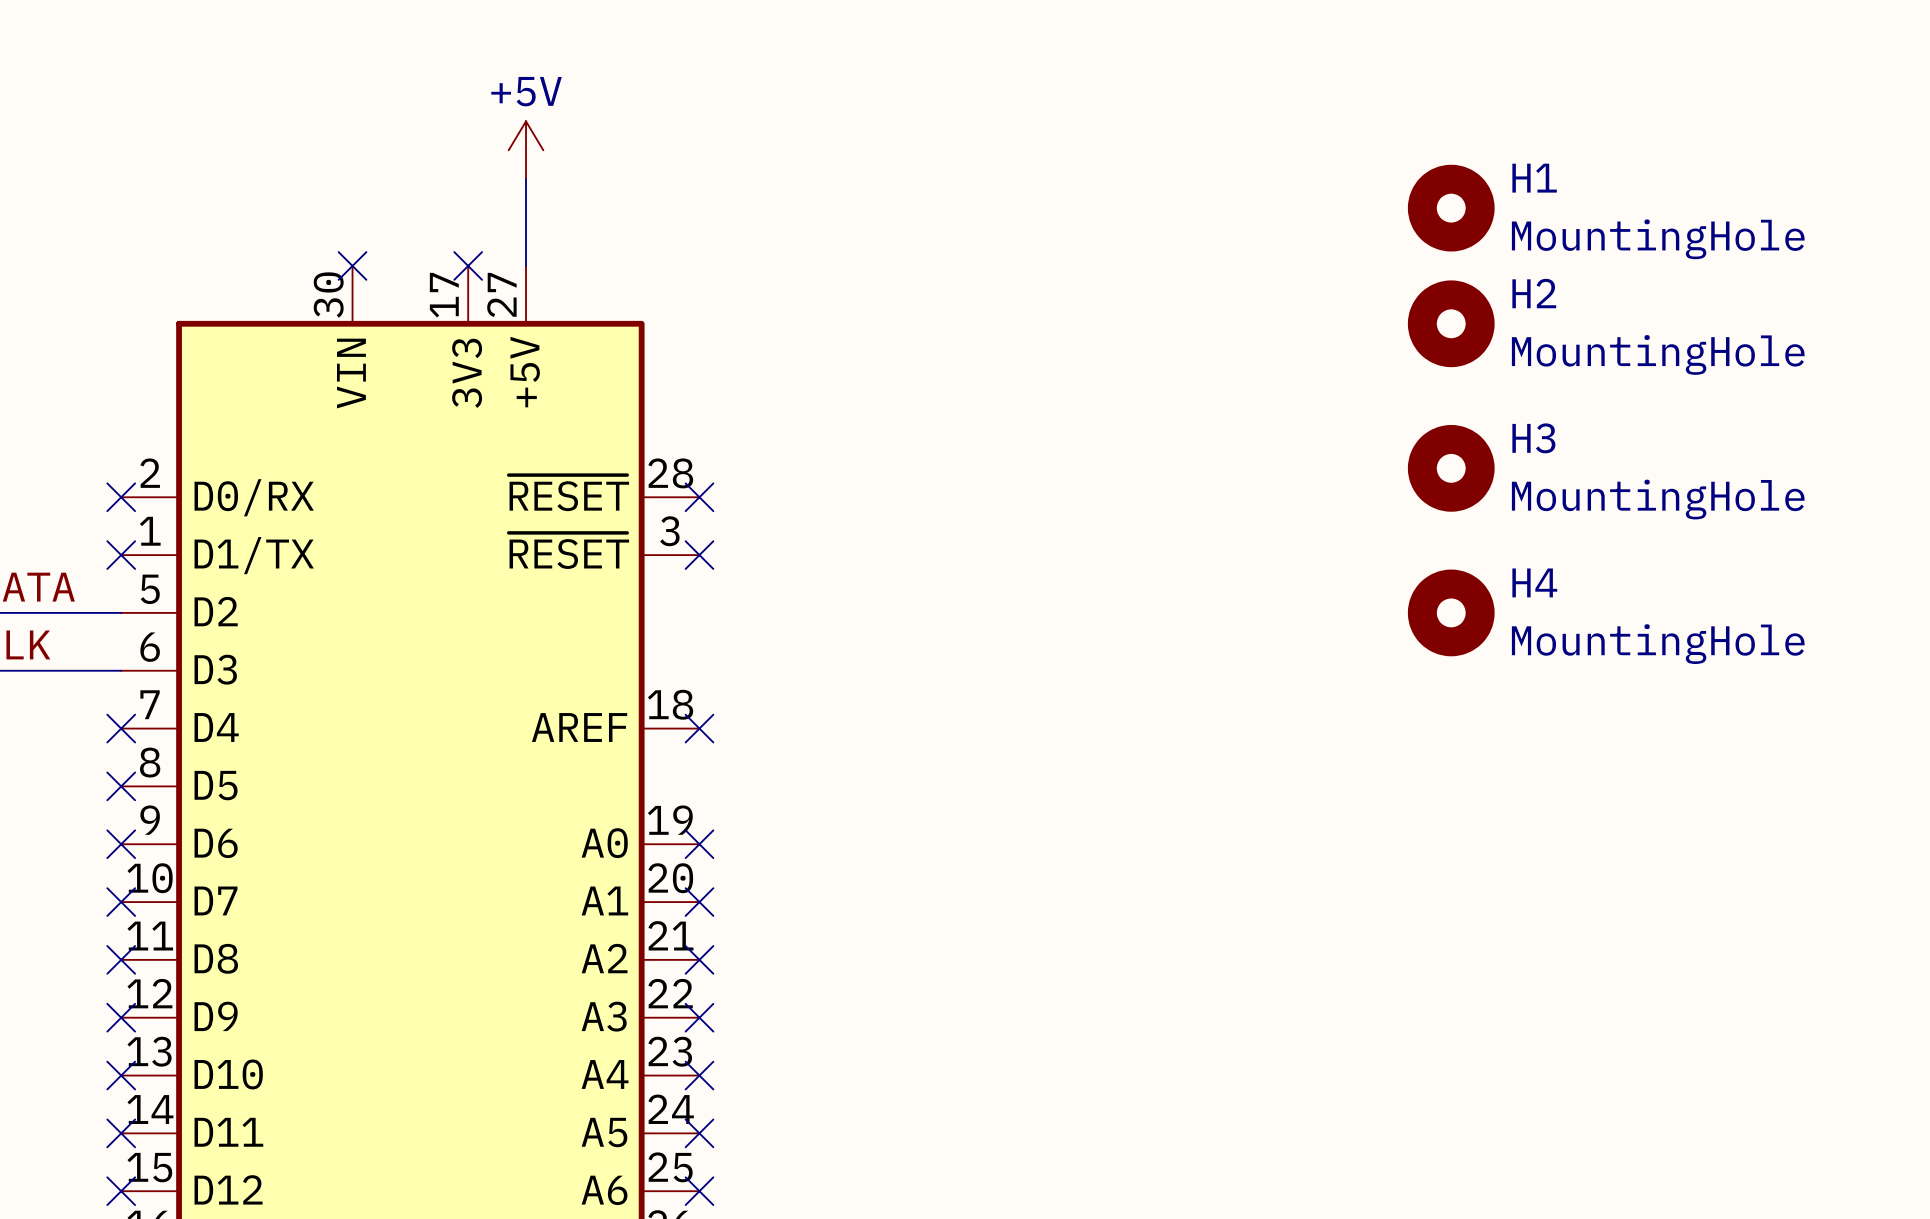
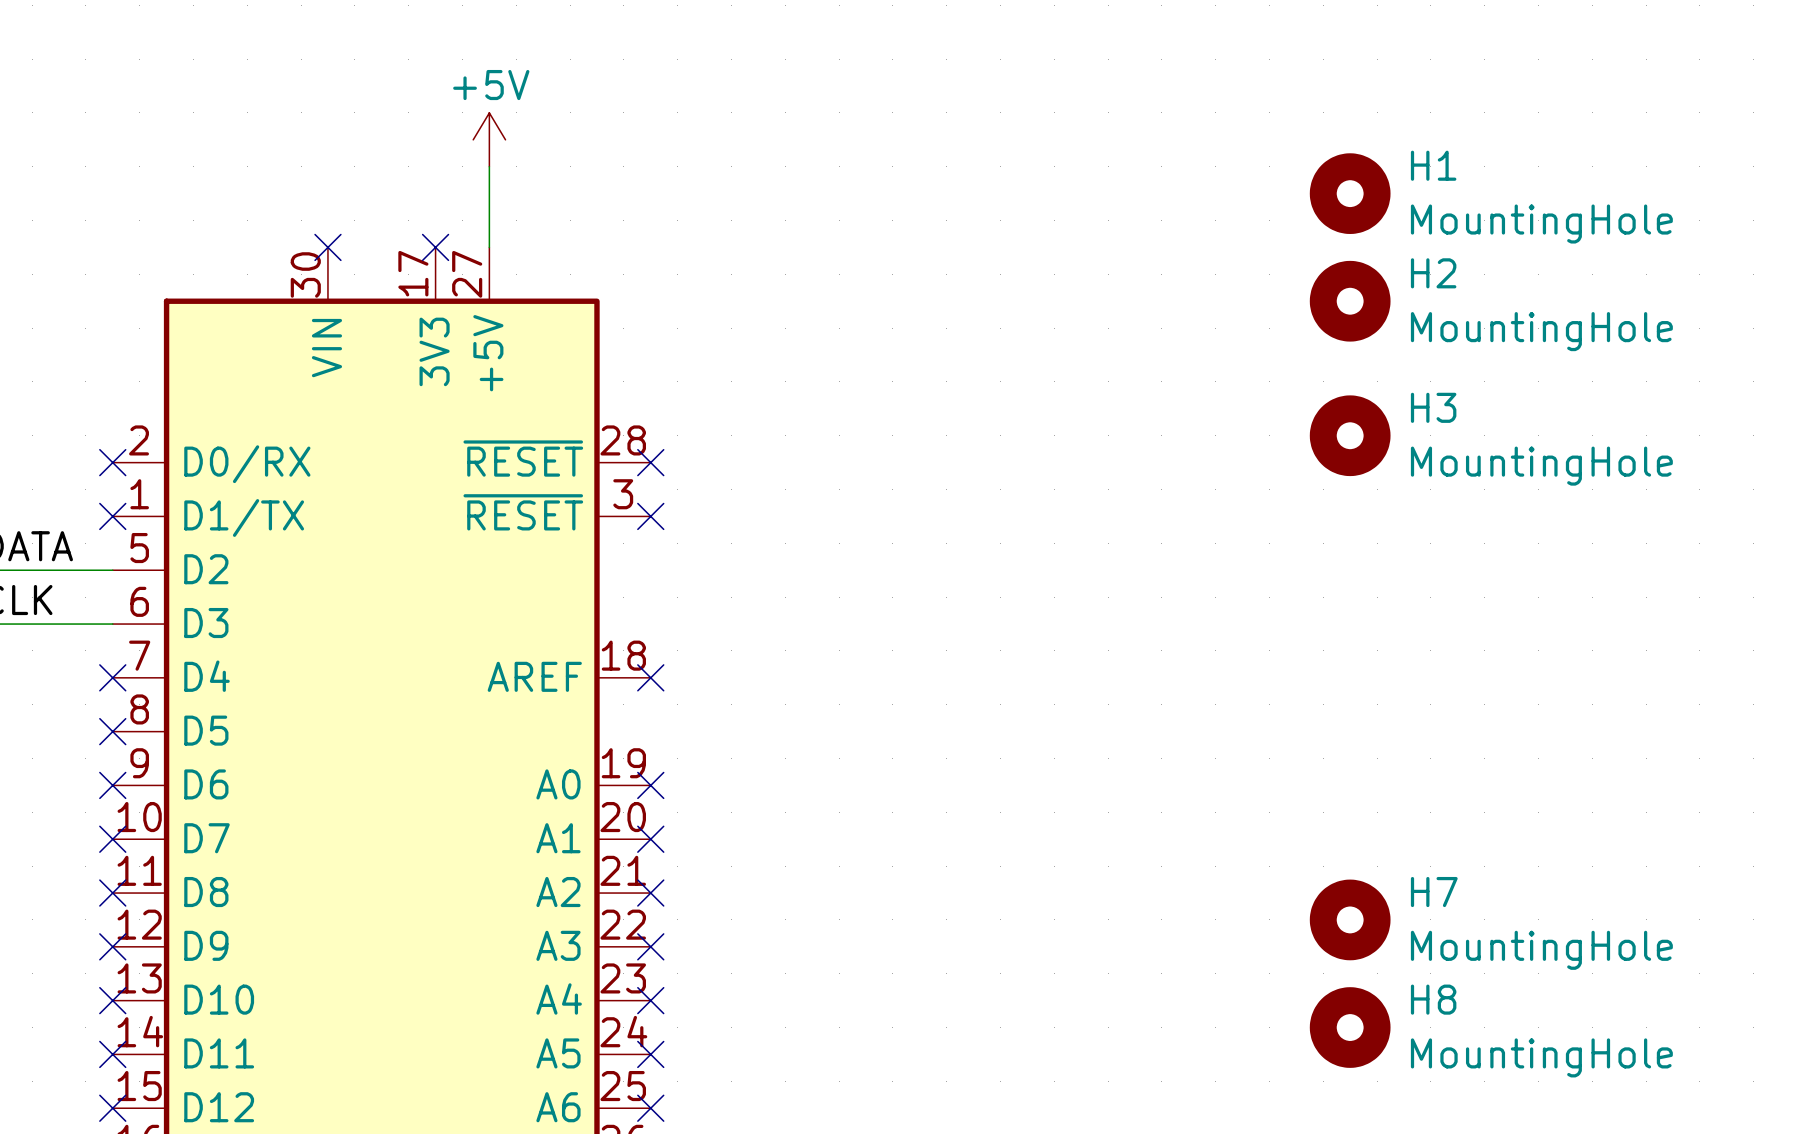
H4: MountingHole (1451, 612) -> none
H7: none -> MountingHole (1350, 919)
H8: none -> MountingHole (1350, 1027)

